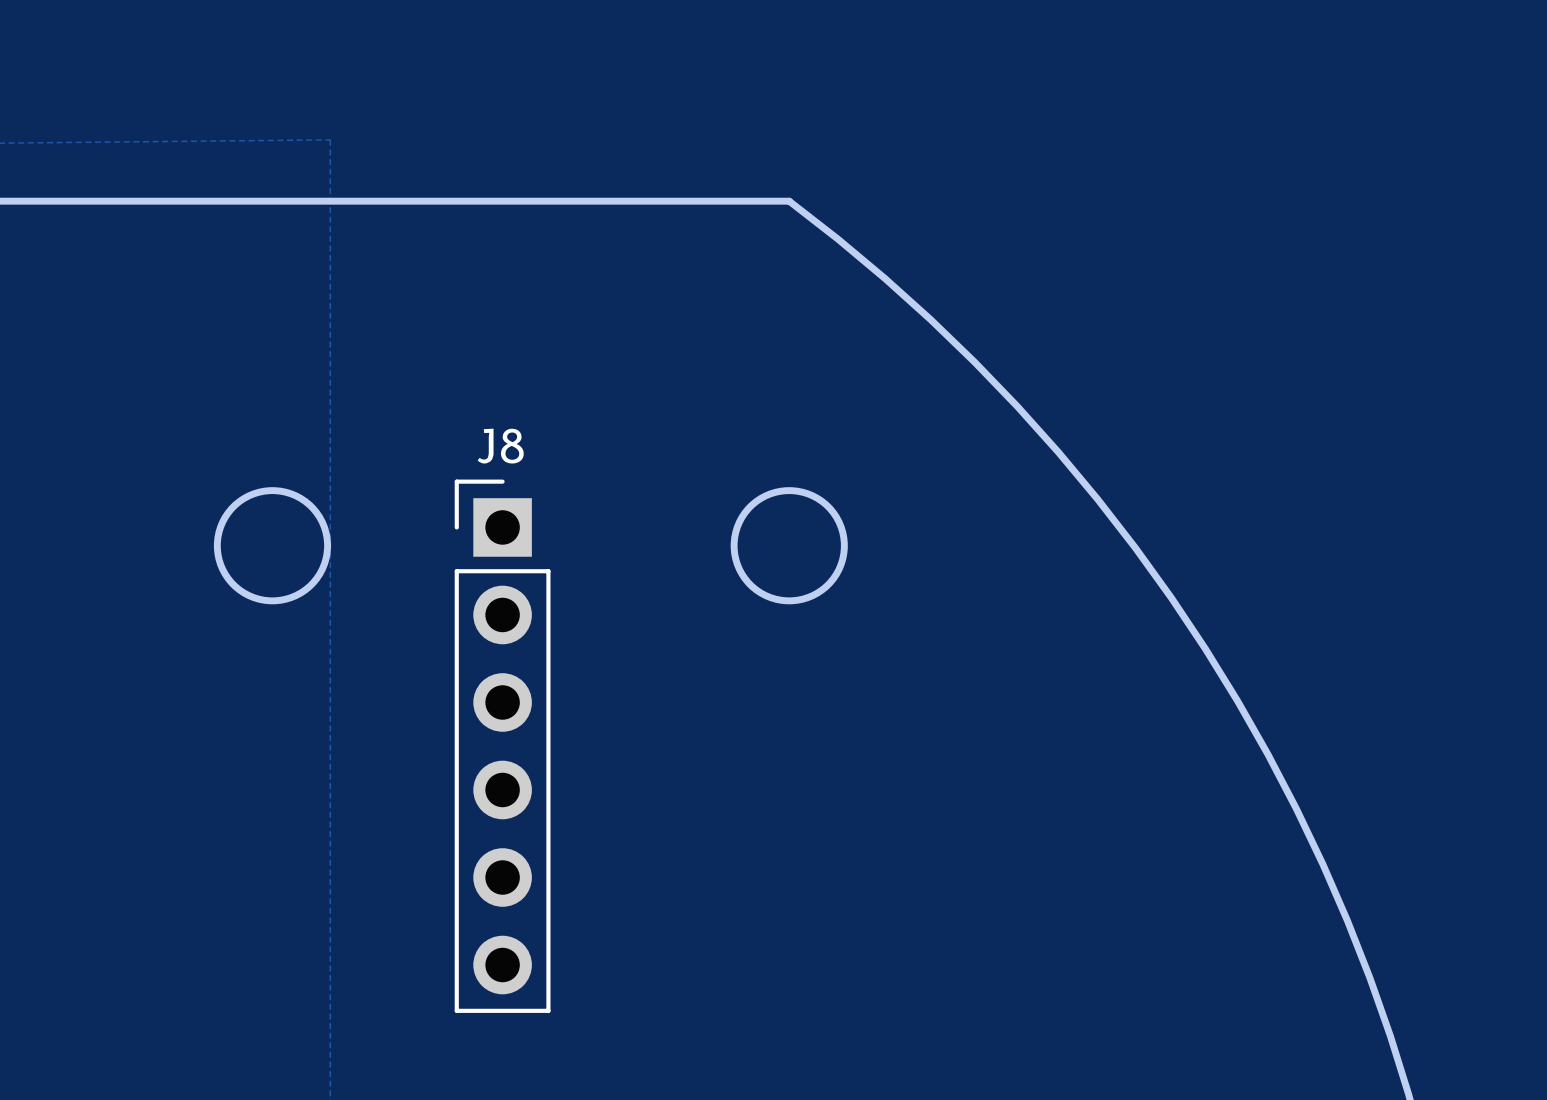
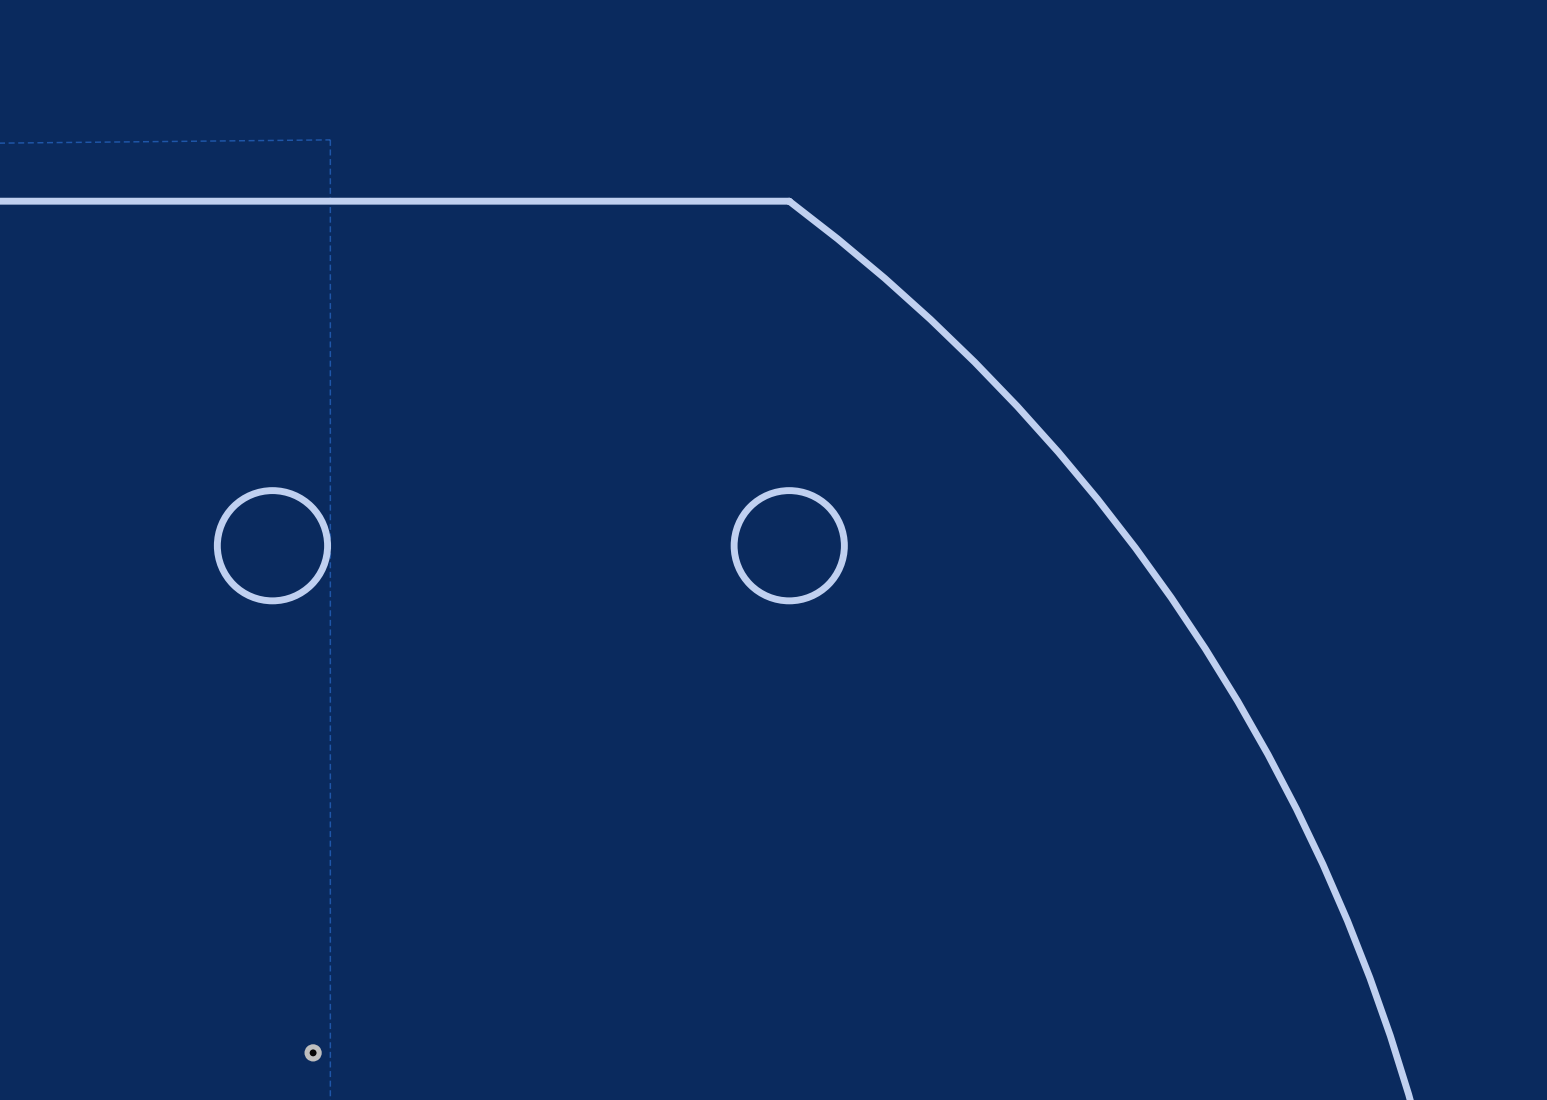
J8: (502, 746) -> none
via: none -> (313, 1052)

